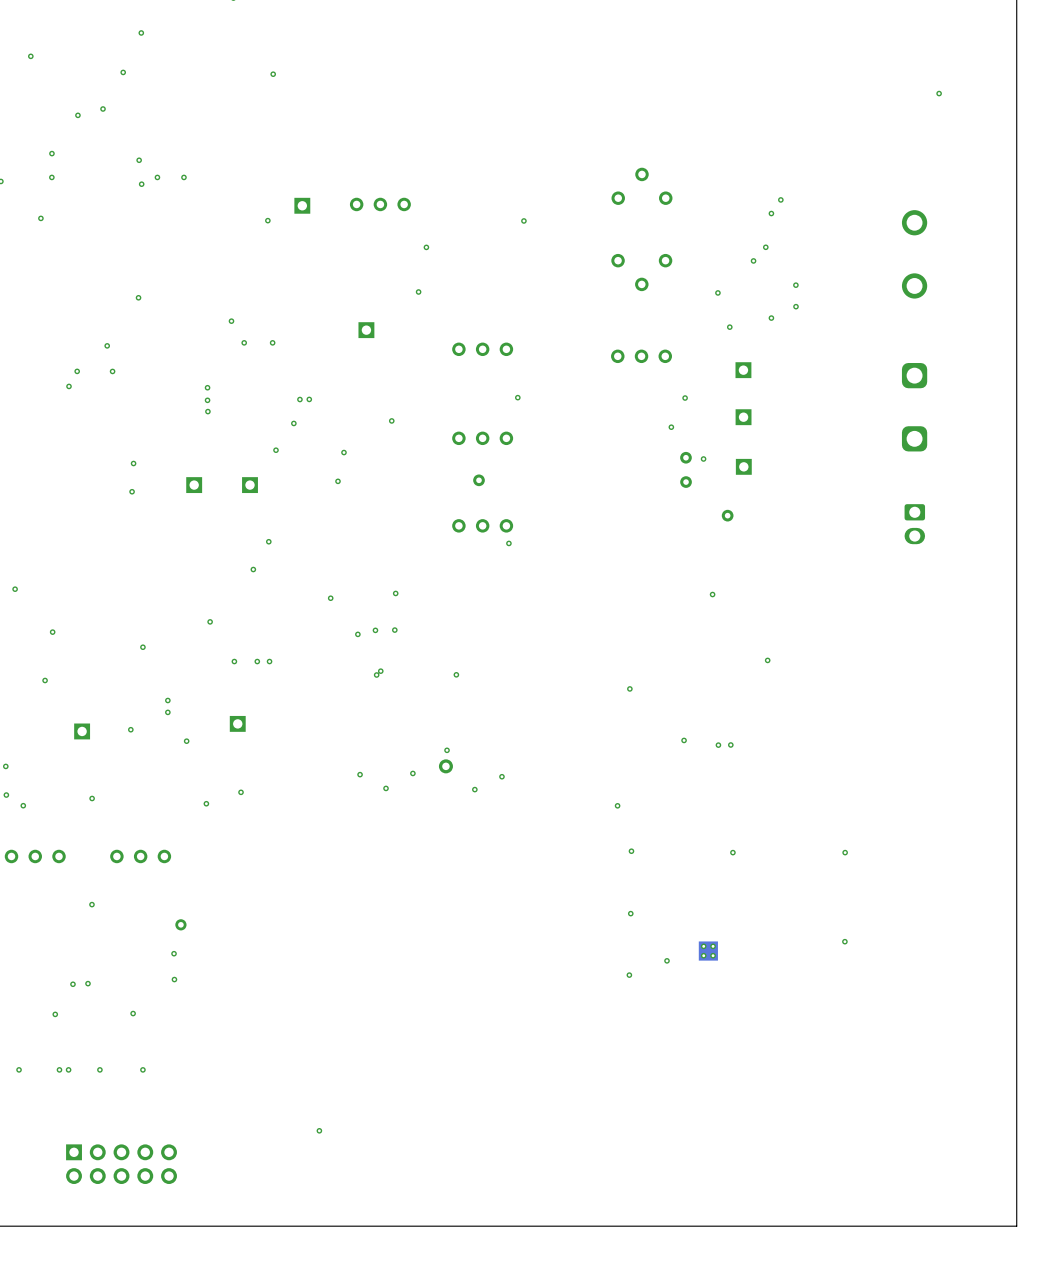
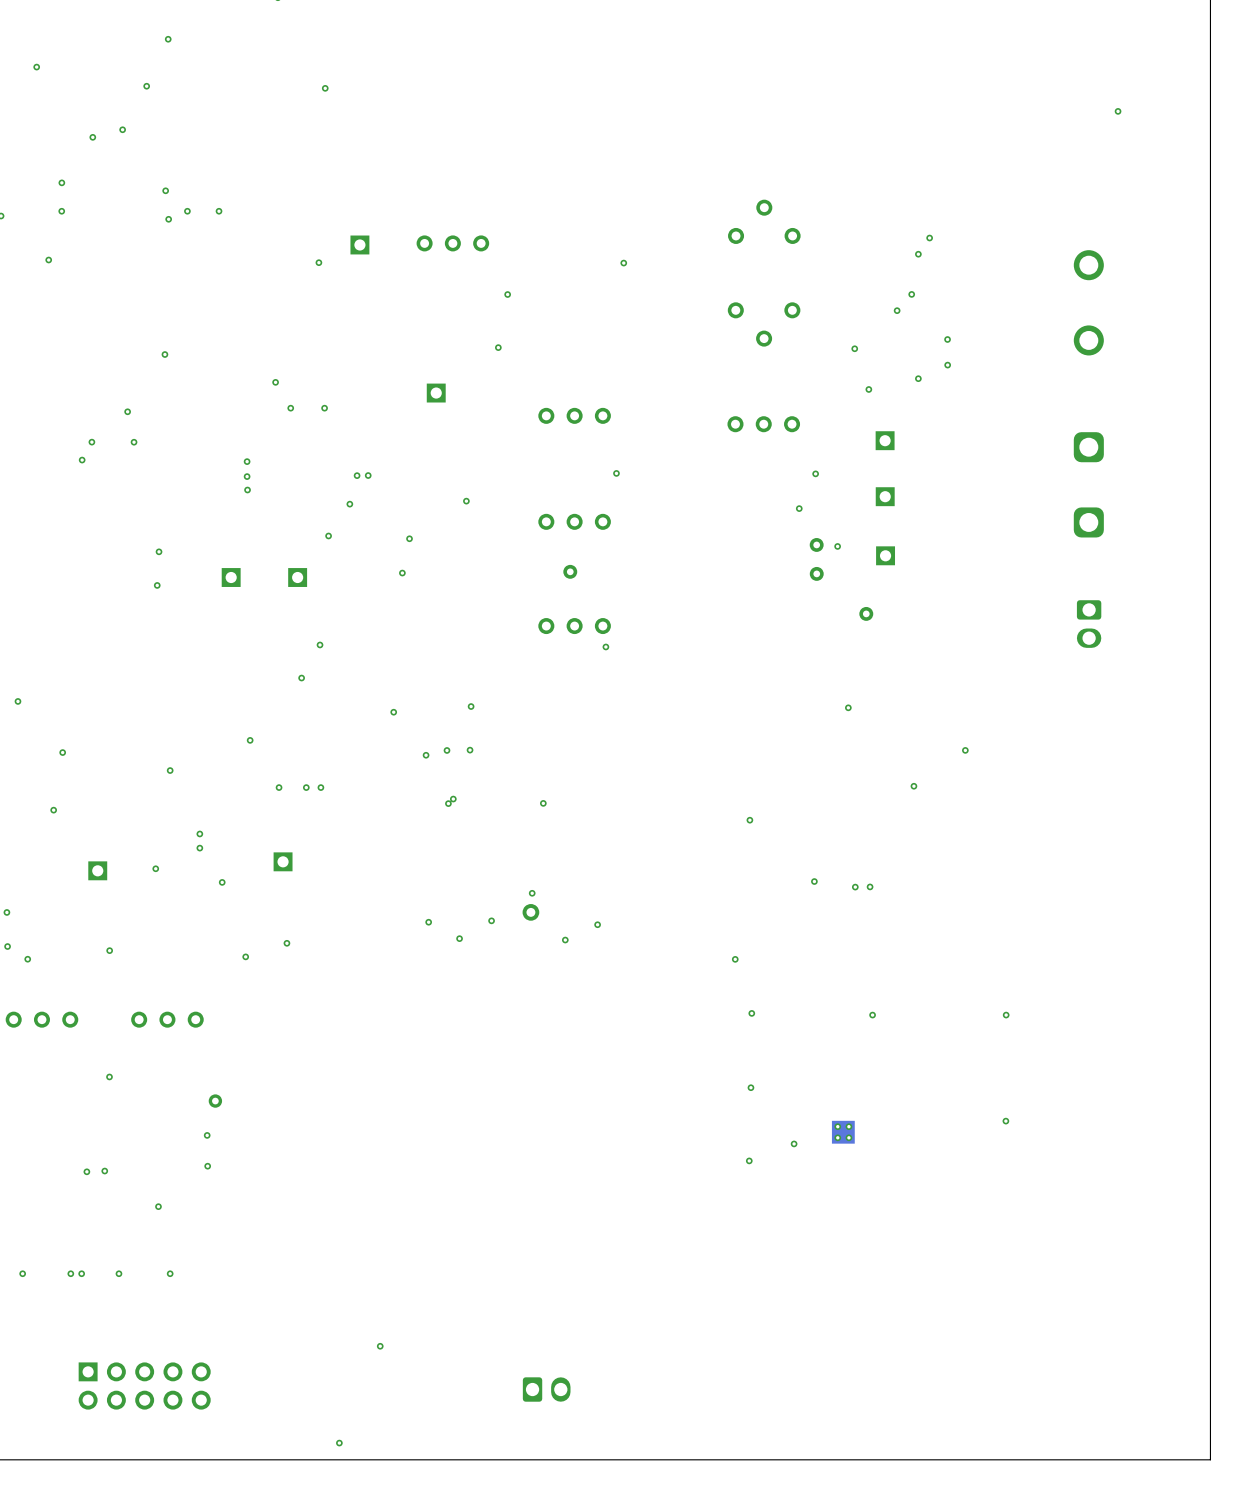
via: none -> (965, 750)
via: (55, 1014) -> none
part: none -> (546, 1389)
via: none -> (339, 1443)

